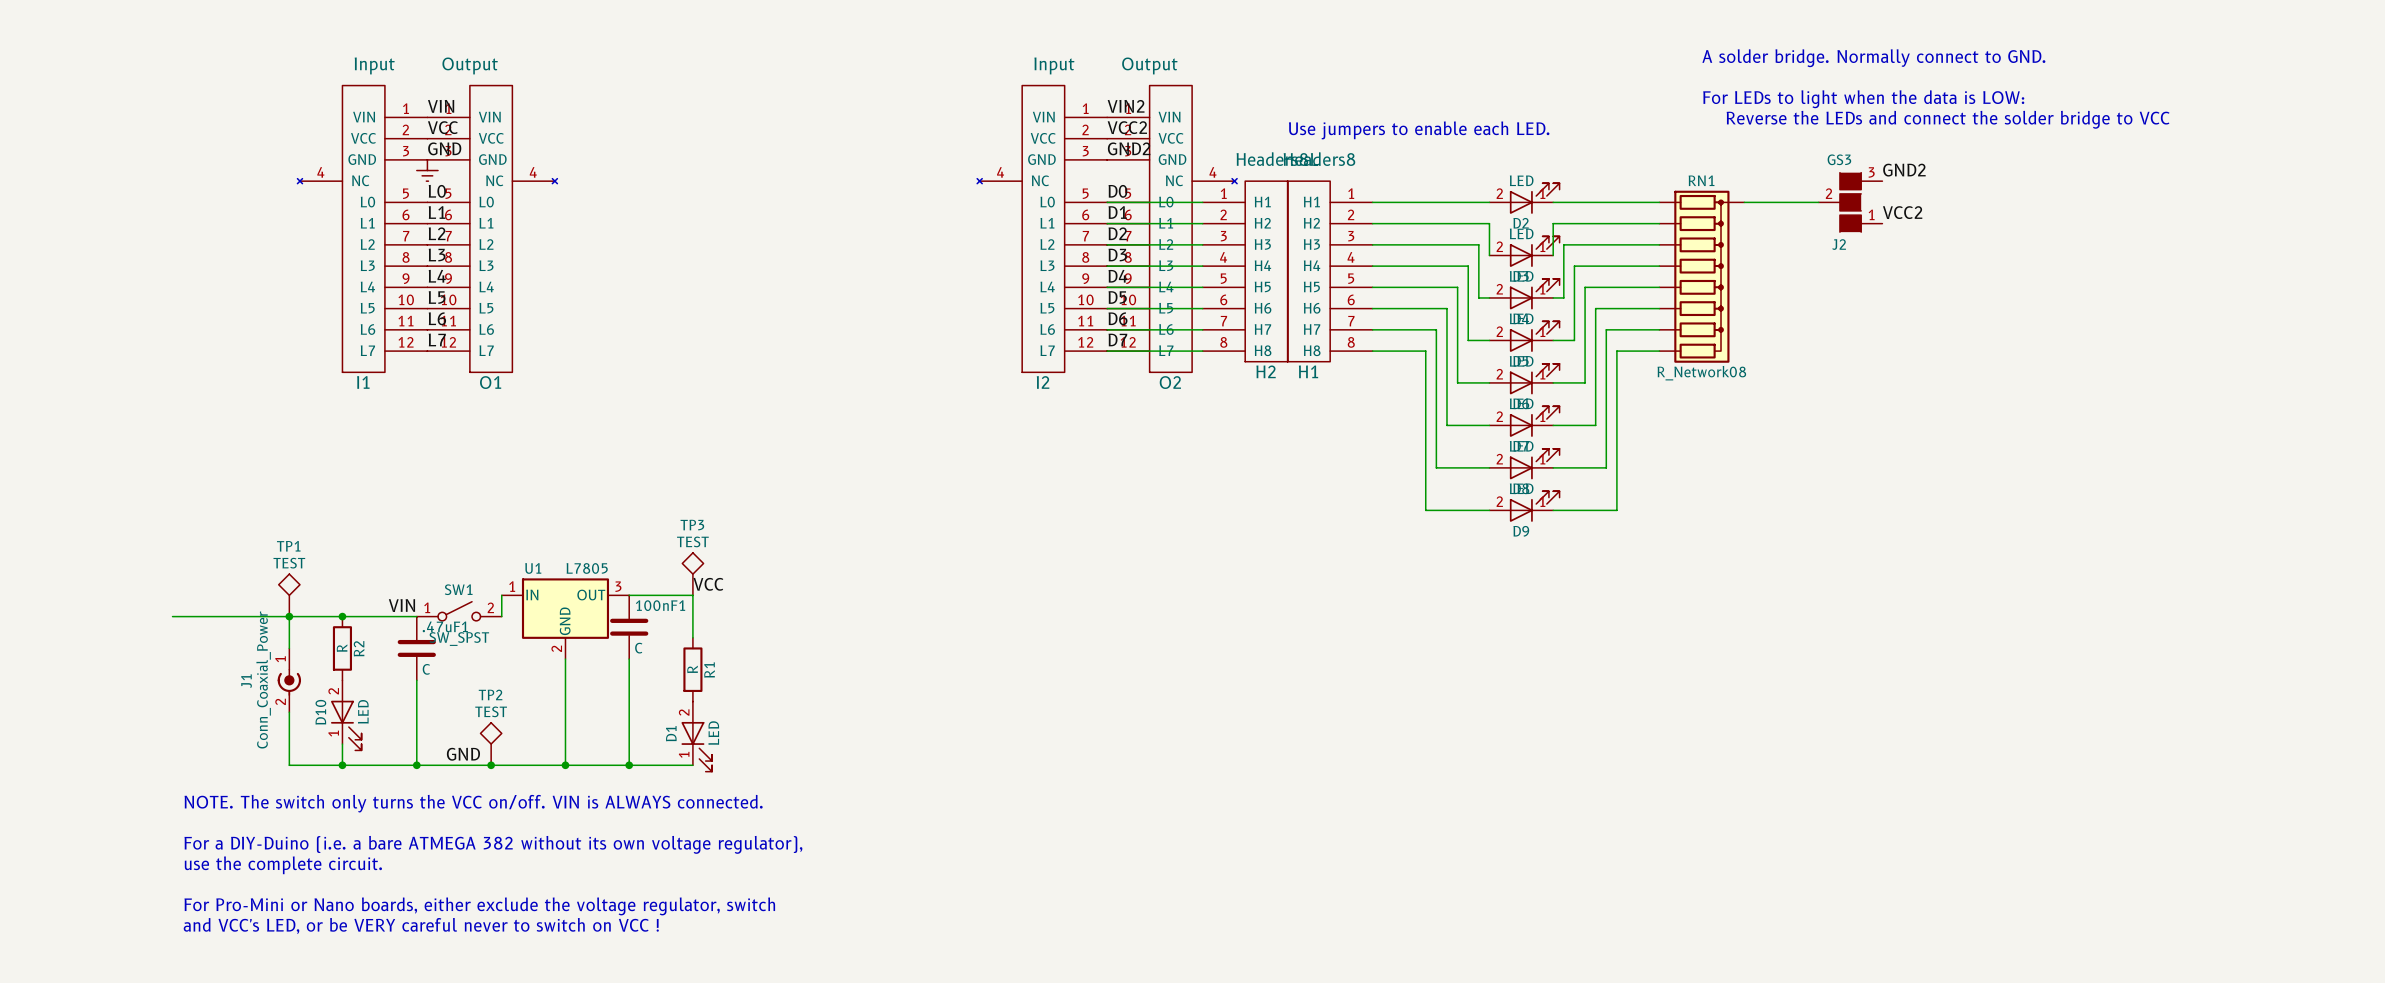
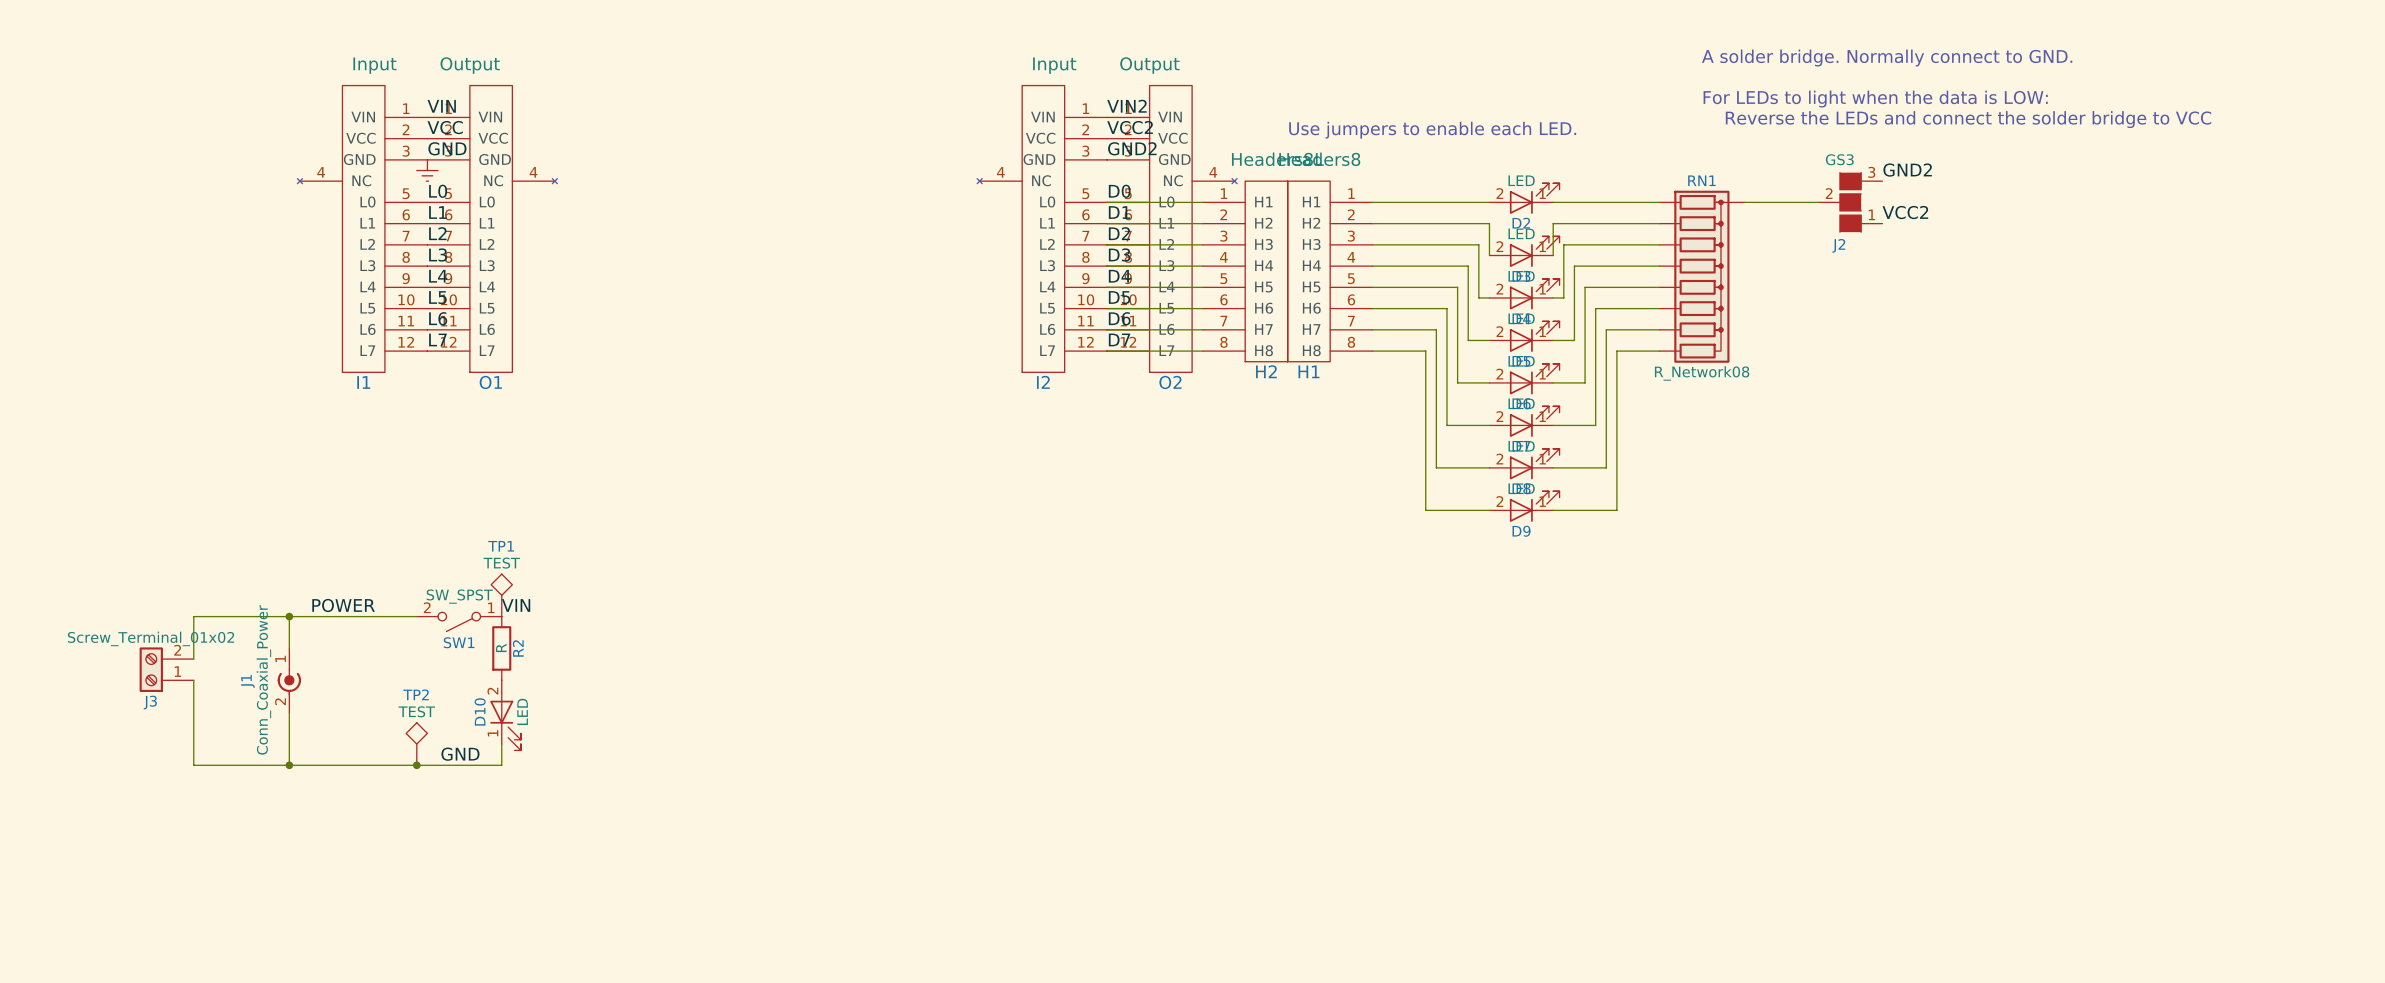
TP3: TEST (692, 574) -> none
label: VCC (708, 584) -> none
TP1 position: (289, 595) -> (501, 595)
wire: (629, 595) (692, 595) (692, 637) -> none
label: none -> POWER (343, 605)
label position: VIN (401, 605) -> VIN (516, 605)
SW1 rotation: 0° (459, 611) -> 180° (459, 621)
wire: (172, 616) (193, 616) -> (193, 659) (193, 616)
junction: (342, 616) -> none
U1: L7805 (565, 618) -> none
100nF1: C (629, 627) -> none
R2 position: (342, 648) -> (501, 648)
.47uF1: C (416, 648) -> none
wire: (565, 659) (565, 765) -> none
wire: (629, 659) (629, 765) -> none
J3: none -> Screw_Terminal_01x02 (166, 669)
R1: R (692, 669) -> none
wire: none -> (193, 680) (193, 765) (289, 765)
wire: (416, 680) (416, 765) -> none
D10 position: (346, 715) -> (505, 715)
D1: LED (696, 736) -> none
wire: (342, 744) (342, 765) -> none
TP2 position: (491, 744) -> (416, 744)
junction: none -> (289, 765)
junction: (342, 765) -> none
junction: (491, 765) -> none
wire: (501, 765) (692, 765) -> (501, 765) (501, 744)
junction: (565, 765) -> none
junction: (629, 765) -> none
text: NOTE. The switch only turns the VCC on/off. VIN is ALWAYS connected. (473, 803) -> none
text: For a DIY-Duino (i.e. a bare ATMEGA 382 without its own voltage regulator), (493, 844) -> none
text: use the complete circuit. (283, 865) -> none
text: For Pro-Mini or Nano boards, either exclude the voltage regulator, switch (479, 906) -> none
text: and VCC's LED, or be VERY careful never to switch on VCC ! (421, 926) -> none

